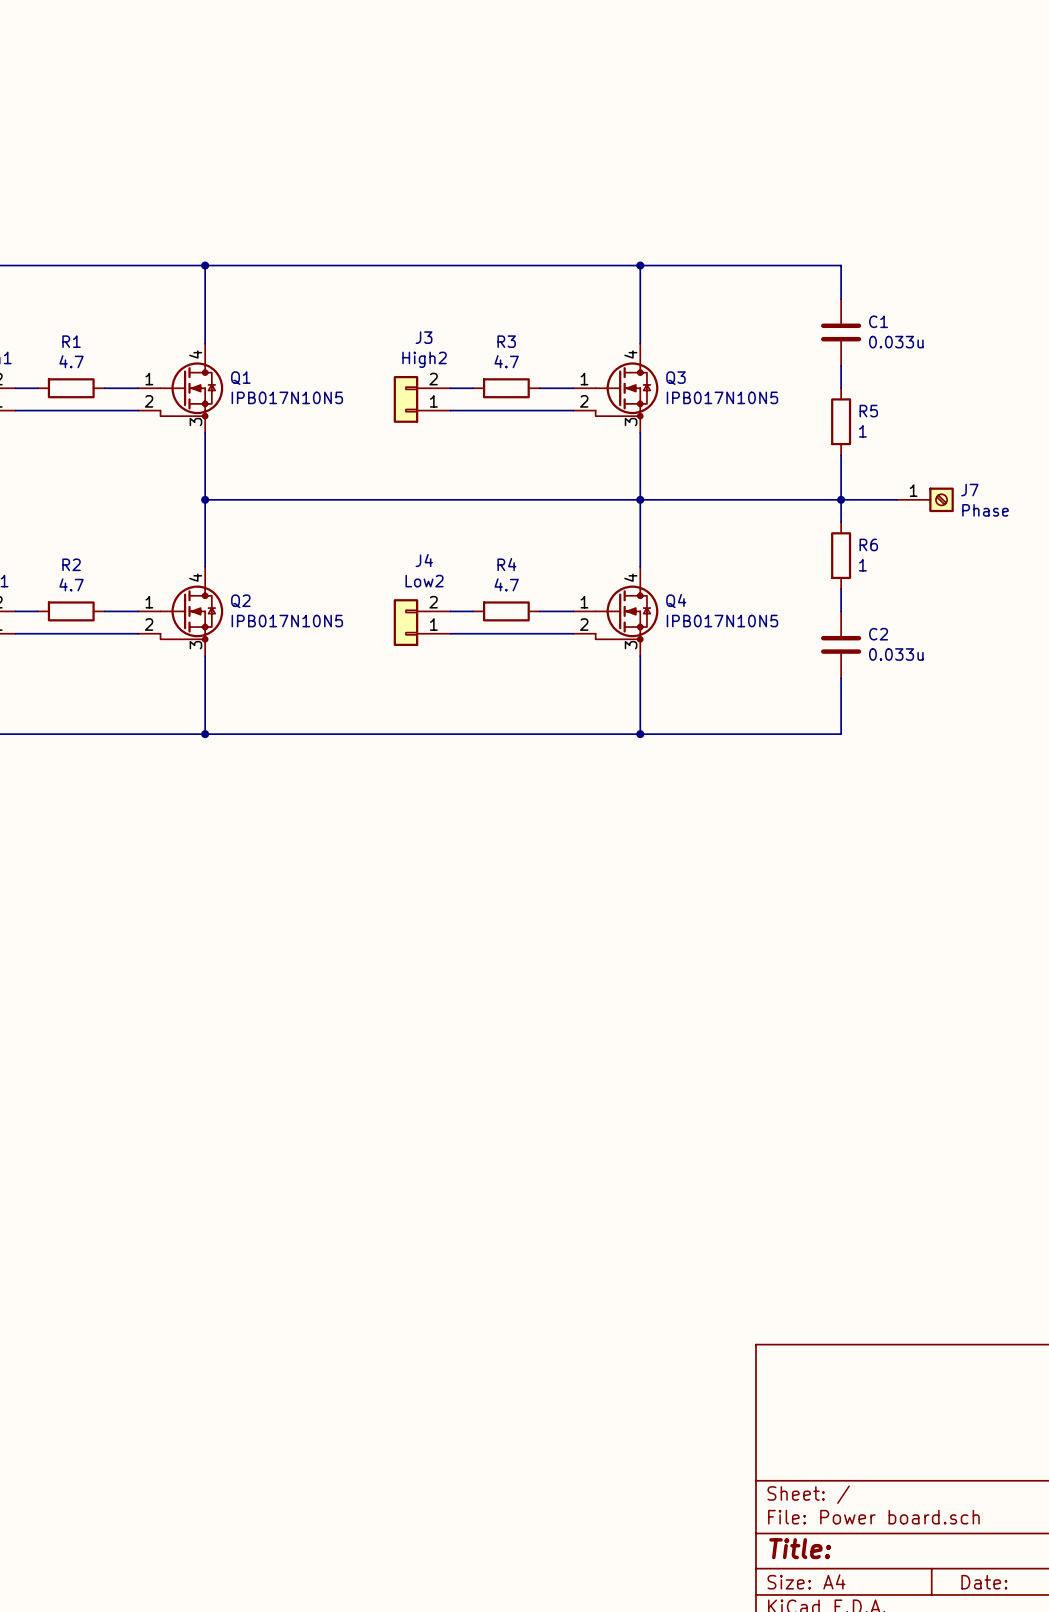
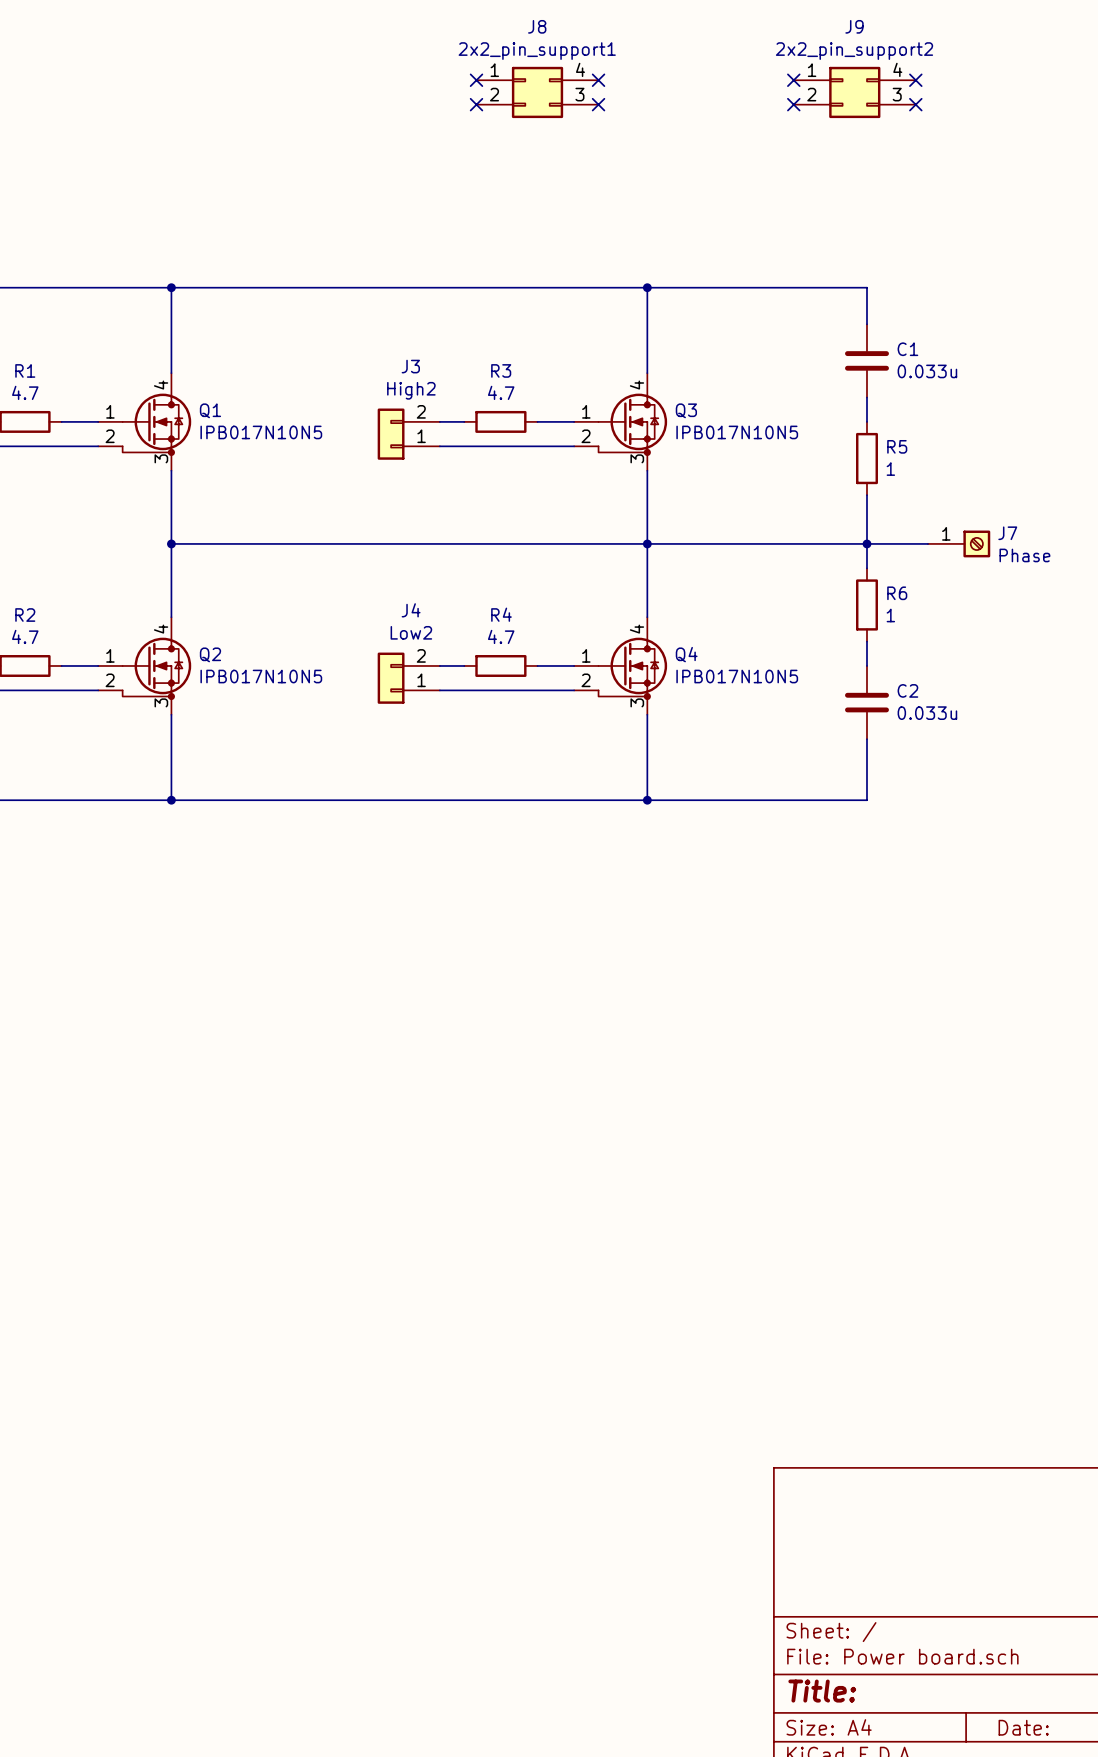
no-connect mark: none -> (476, 80)
no-connect mark: none -> (598, 80)
no-connect mark: none -> (793, 80)
no-connect mark: none -> (915, 80)
J8: none -> 2x2_pin_support1 (537, 92)
J9: none -> 2x2_pin_support2 (854, 92)
no-connect mark: none -> (476, 104)
no-connect mark: none -> (598, 104)
no-connect mark: none -> (793, 104)
no-connect mark: none -> (915, 104)

